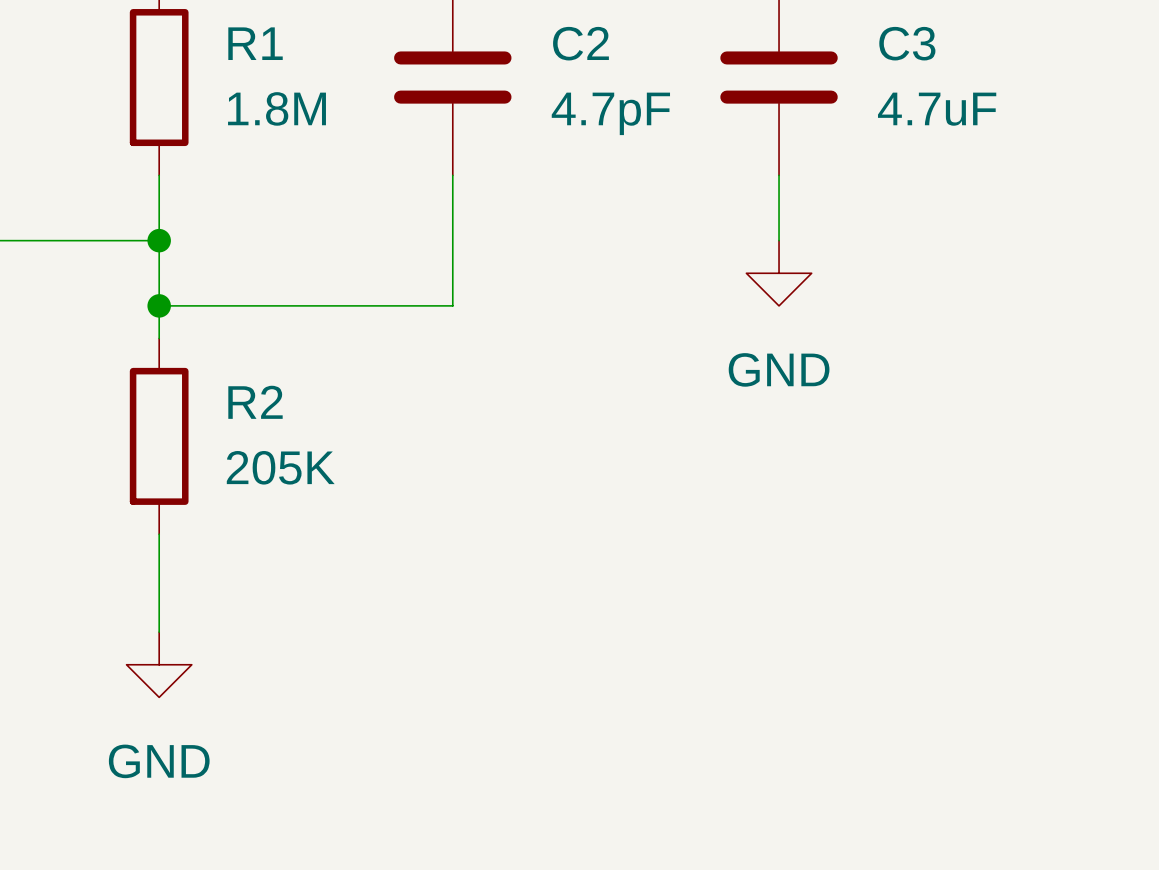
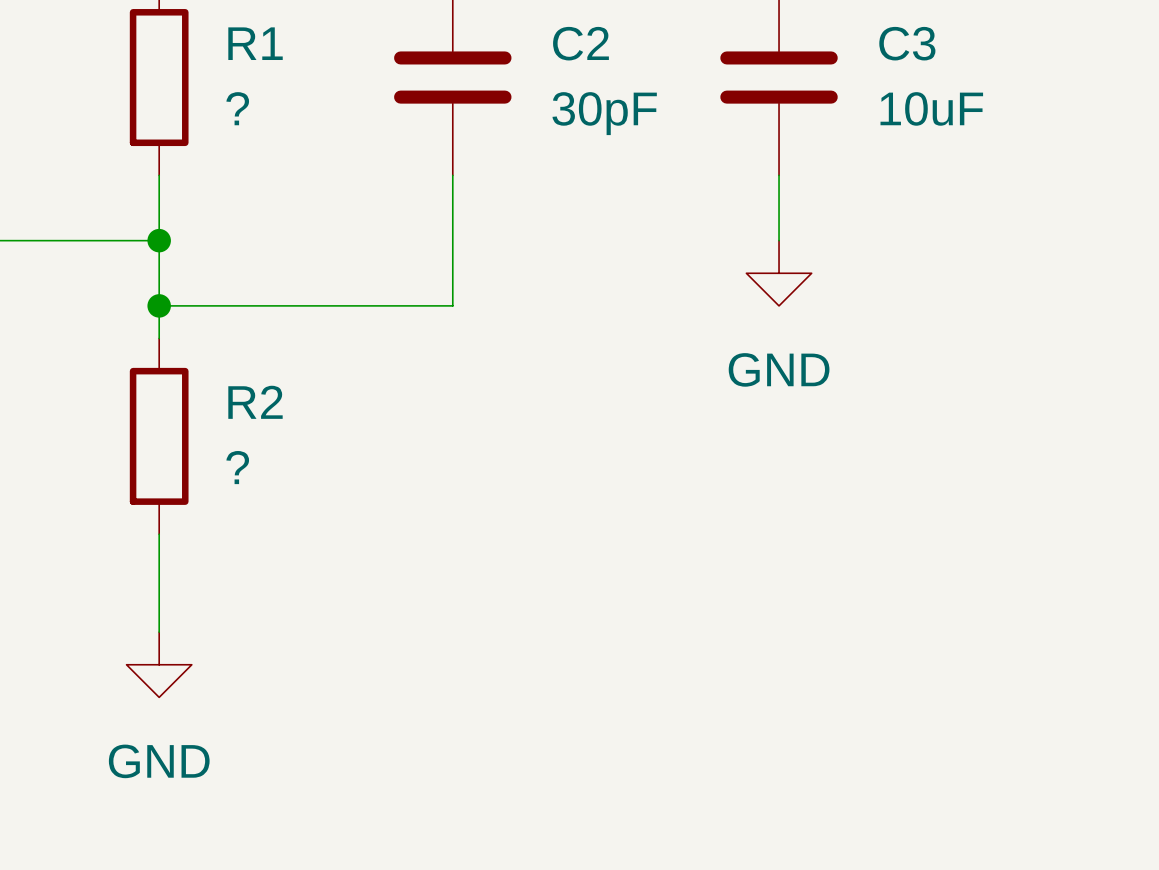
R1 value: 1.8M (277, 108) -> ? (237, 108)
C3 value: 4.7uF (937, 109) -> 10uF (931, 108)
C2 value: 4.7pF (610, 113) -> 30pF (604, 113)
R2 value: 205K (280, 467) -> ? (237, 467)

